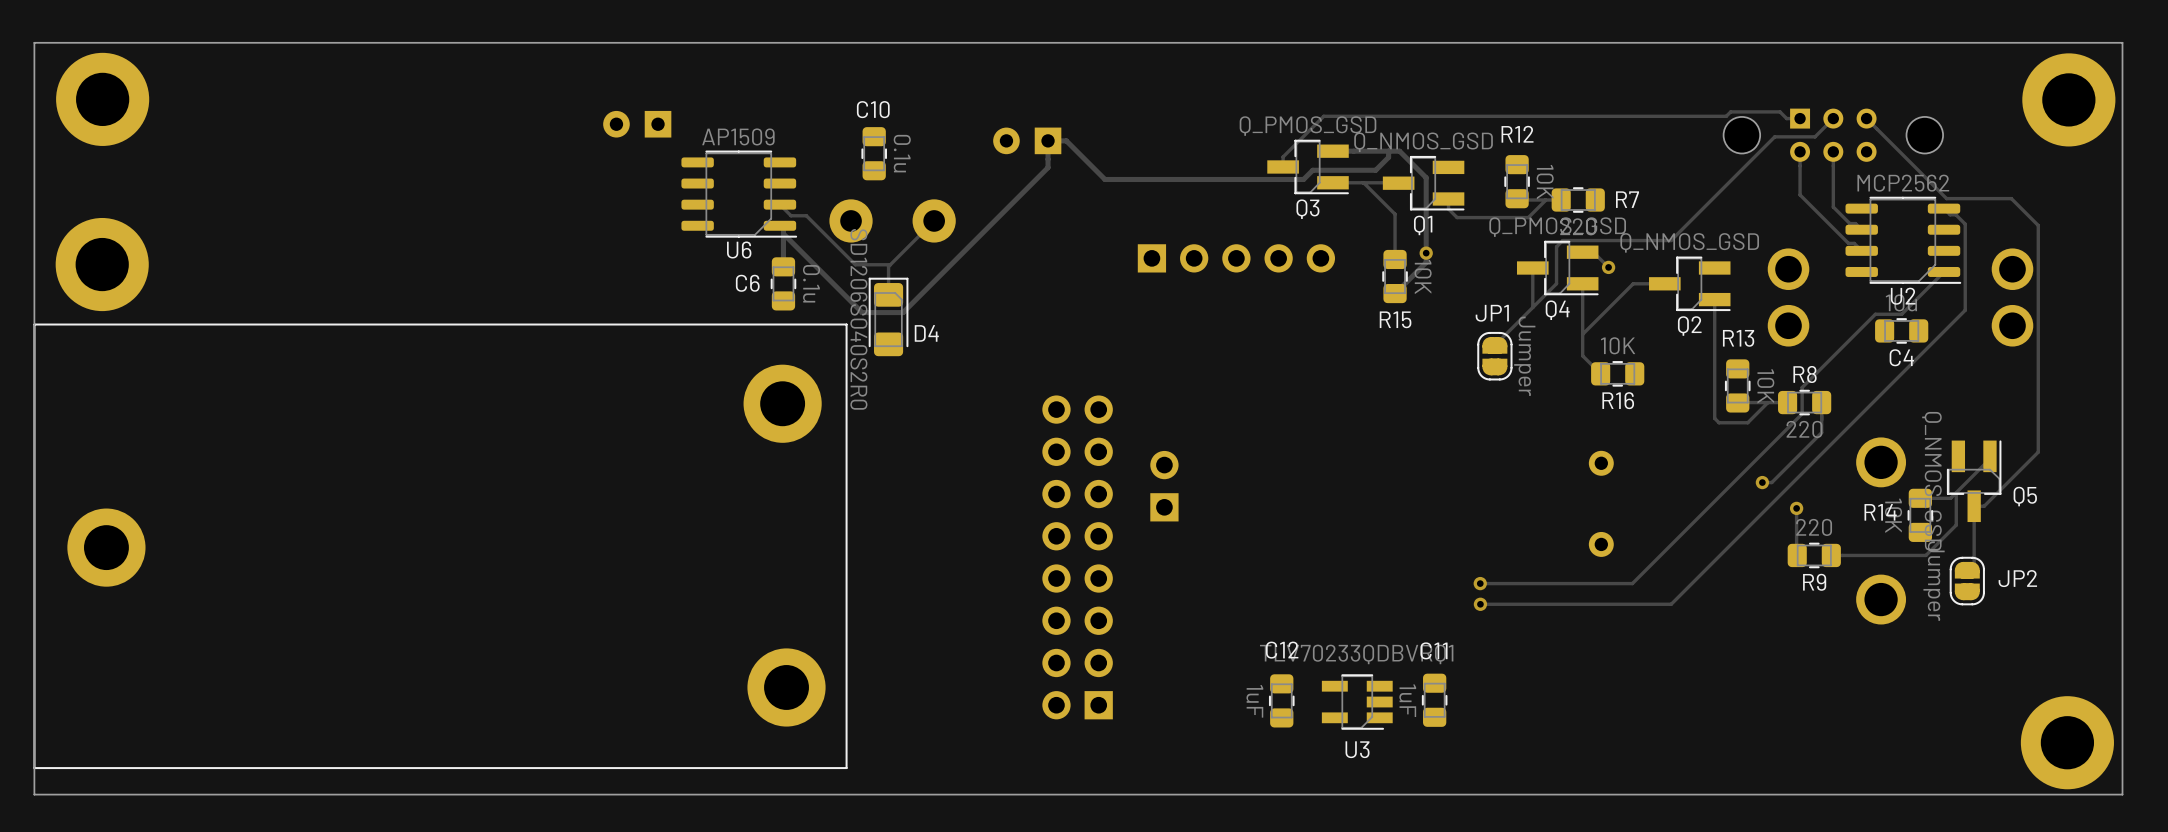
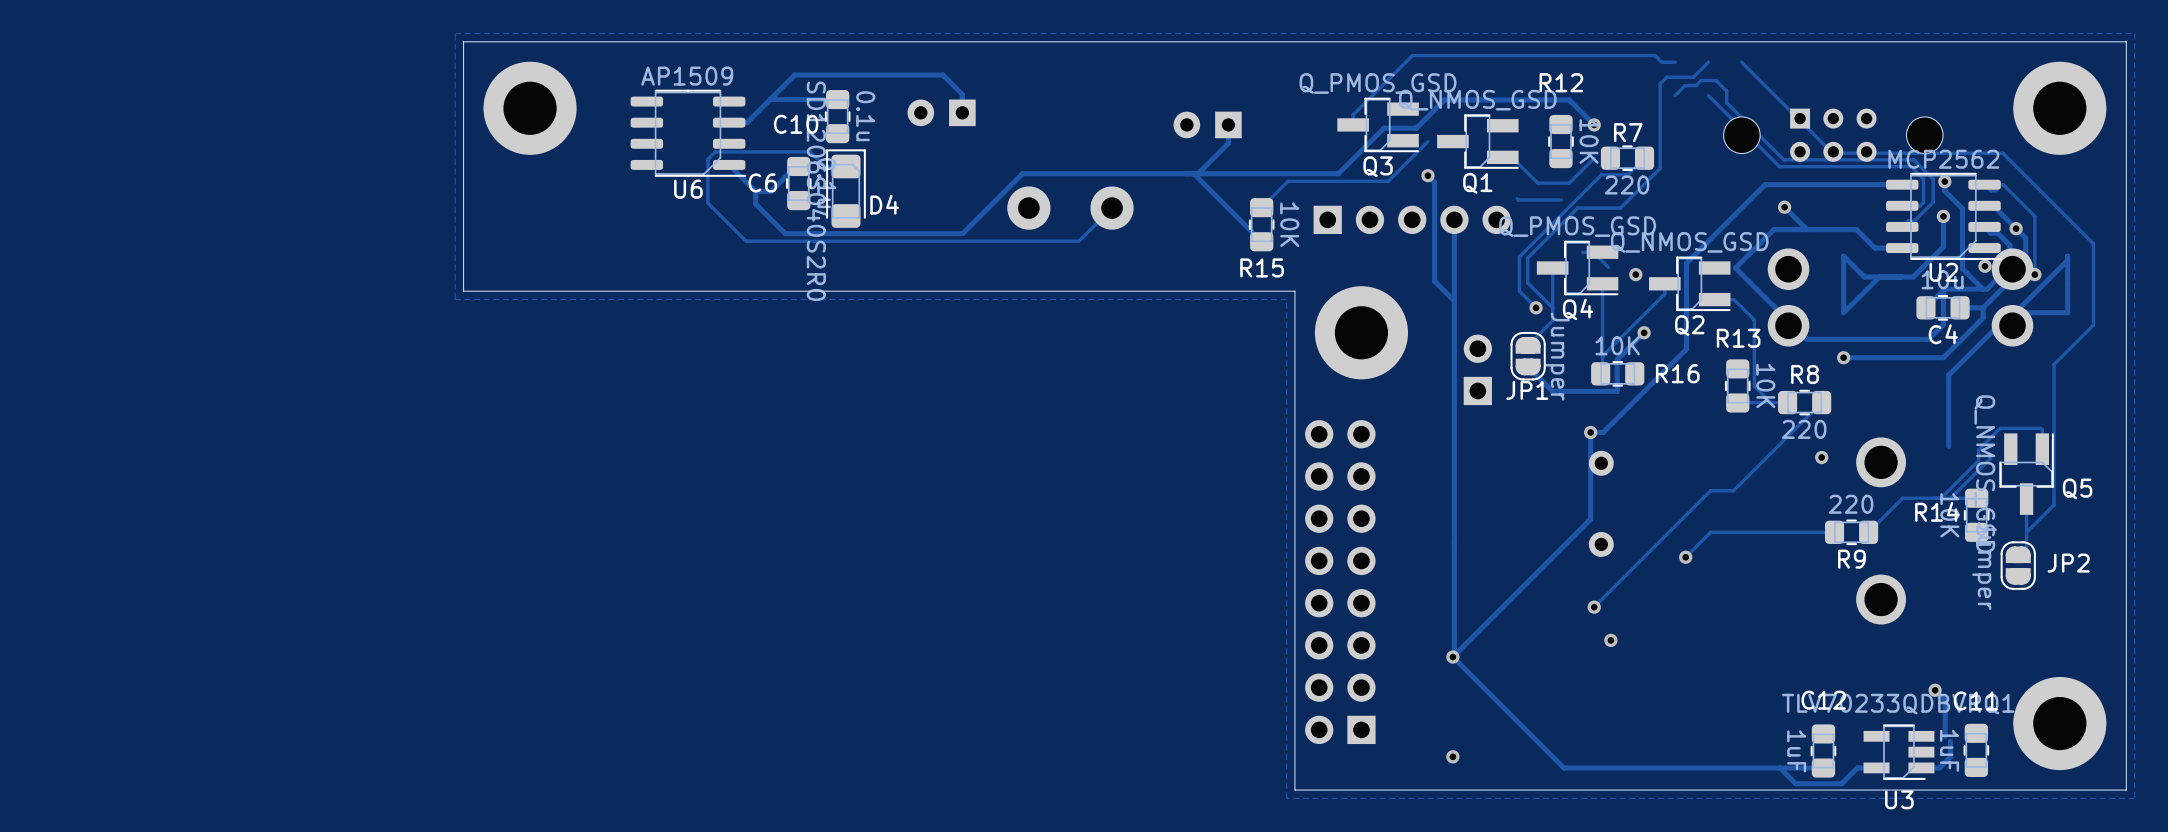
zone outline: none -> (2134, 33) (2134, 798) (1286, 798) (1286, 299) (455, 299) (455, 33) (2134, 33)
board edge: (2122, 42) (34, 42) (34, 794) (2122, 794) (2122, 42) -> (2126, 41) (2126, 790) (1294, 790) (1294, 291) (463, 291) (463, 41) (2126, 41)
track: none -> (1675, 62) (1661, 62) (1655, 55) (1412, 55) (1353, 114) (1353, 124)
track: none -> (1708, 62) (1693, 77) (1666, 77) (1660, 83) (1660, 168) (1620, 208) (1577, 208) (1527, 257) (1527, 282) (1552, 307)
track: none -> (1741, 62) (1832, 153) (2002, 153) (2093, 243) (2093, 325) (2054, 364) (2054, 504) (2026, 532)
track: none -> (1675, 95) (1685, 85) (1696, 85) (1701, 80) (1716, 80) (1726, 91) (1726, 102) (1783, 159) (1913, 159) (1933, 179) (1933, 202) (1914, 220) (1908, 220) (1902, 226)
track: none -> (1708, 95) (1779, 166) (1910, 166) (1923, 179) (1923, 202) (1920, 205) (1902, 205)
part: (102, 99) -> none
track: none -> (770, 99) (837, 99)
part position: (2068, 99) -> (2059, 108)
part: none -> (530, 108)
C10 name position: C10 (873, 109) -> C10 (796, 124)
track: none -> (962, 112) (962, 94) (942, 75) (794, 75) (747, 122) (729, 122)
track: (1800, 118) (1786, 118) (1780, 111) (1730, 111) (1726, 116) (1323, 116) (1283, 156) (1283, 166) -> none
track: (1833, 118) (1815, 136) (1774, 136) (1671, 240) (1562, 240) (1556, 246) (1556, 283) (1494, 345) -> none
track: (1866, 118) (1946, 198) (2011, 198) (2038, 225) (2038, 452) (1984, 506) (1974, 506) (1974, 563) (1967, 570) -> none
part: (637, 124) -> none
part: none -> (1207, 124)
track: none -> (1228, 124) (1228, 143) (1197, 173)
track: none -> (1594, 124) (1569, 99) (1444, 99) (1416, 128) (1383, 128) (1338, 173) (1022, 173) (962, 233) (785, 233) (755, 204) (755, 191)
via: none -> (1594, 124)
R12 name position: R12 (1517, 134) -> R12 (1561, 82)
part position: (1027, 140) -> (941, 112)
track: none -> (1427, 141) (1388, 181) (1288, 181) (1261, 207)
track: (1332, 151) (1399, 151) (1426, 177) (1426, 262) (1395, 293) -> none
track: (1388, 151) (1388, 157) (1375, 170) (1312, 170) (1303, 179) (1105, 179) (1066, 140) (1048, 140) (1048, 167) (903, 312) (862, 312) (783, 233) -> none
track: (1800, 151) (1800, 194) (1848, 243) (1854, 243) (1861, 250) -> none
track: (1833, 151) (1833, 207) (1849, 223) (1855, 223) (1861, 229) -> none
C10 position: (874, 153) -> (837, 116)
track: none -> (1502, 157) (1511, 157) (1537, 183) (1569, 183) (1594, 158)
track: none -> (1644, 158) (1627, 174) (1601, 174) (1519, 256) (1519, 291) (1536, 307)
track: none -> (729, 164) (755, 191)
track: none -> (845, 166) (824, 166) (810, 151) (715, 151) (707, 159) (707, 203) (746, 241) (1078, 241) (1112, 208)
Q3 position: (1308, 166) -> (1378, 124)
track: none -> (788, 173) (771, 191) (755, 191)
track: none -> (1193, 173) (1261, 241)
track: none -> (1427, 175) (1434, 182) (1434, 281) (1454, 301)
via: none -> (1427, 175)
R12 position: (1517, 181) -> (1560, 141)
track: none -> (1944, 181) (1944, 190) (1962, 208) (1962, 268) (1982, 289)
via: none -> (1944, 181)
track: (1332, 182) (1398, 183) -> none
track: (1363, 182) (1395, 214) (1395, 259) -> none
Q1 position: (1423, 183) -> (1477, 141)
track: none -> (1902, 184) (1764, 184) (1686, 263) (1686, 349) (1603, 432) (1590, 432) (1590, 519) (1452, 657) (1563, 768) (1823, 768)
track: none -> (1996, 190) (1990, 190) (1984, 184) (2003, 184) (2034, 216) (2034, 274)
U6 position: (739, 194) -> (688, 133)
track: (1448, 198) (1448, 209) (1457, 217) (1528, 217) (1545, 200) -> none
R7 name position: R7 (1627, 199) -> R7 (1628, 132)
R7 position: (1578, 200) -> (1627, 158)
track: (779, 204) (791, 215) (806, 215) (855, 264) (890, 264) -> none
track: none -> (1984, 205) (1993, 205) (2025, 238) (2025, 265) (1983, 307)
track: none -> (1784, 207) (1806, 229)
via: none -> (1784, 207)
track: (1944, 208) (1950, 214) (1955, 214) (1965, 224) (1965, 310) (1671, 604) (1480, 604) -> none
track: none -> (1943, 216) (1943, 246) (1913, 276) (1864, 276) (1843, 256) (1843, 312) (1879, 276)
via: none -> (1943, 216)
track: none -> (1454, 219) (1454, 655)
part position: (892, 220) -> (1070, 208)
track: (934, 220) (888, 266) (888, 294) -> none
track: (779, 225) (783, 229) (783, 266) -> none
track: none -> (1984, 226) (1990, 233) (1997, 233) (2009, 245) (2009, 266) (1987, 289) (1944, 289) (1925, 307)
via: none -> (2016, 228)
U2 position: (1903, 240) -> (1943, 216)
track: none -> (1902, 248) (1874, 248) (1856, 229) (1774, 229) (1735, 268) (1806, 339) (1928, 339) (1943, 324) (1943, 290)
via: (1426, 253) -> none
track: none -> (2067, 256) (2067, 312) (2011, 312) (1948, 375) (1948, 446)
part position: (1236, 258) -> (1412, 219)
track: none -> (2067, 260) (2015, 312)
part: (102, 264) -> none
via: none -> (1985, 266)
via position: (1608, 267) -> (1635, 274)
track: (1532, 268) (1532, 307) -> none
track: none -> (1552, 268) (1552, 320) (1528, 345)
Q4 position: (1557, 268) -> (1577, 268)
track: (1944, 271) (1901, 314) (1875, 314) (1802, 387) (1802, 413) (1632, 583) (1480, 583) -> none
via: none -> (2034, 274)
R15 position: (1395, 276) -> (1261, 224)
C6 position: (783, 283) -> (798, 183)
track: (1582, 283) (1582, 355) (1600, 373) -> (1602, 283) (1602, 371) (1600, 373)
track: (1664, 283) (1633, 283) (1582, 334) -> (1664, 283) (1664, 293) (1602, 356)
track: (1714, 299) (1714, 418) (1719, 422) (1747, 422) (1767, 402) -> (1714, 299) (1733, 299) (1754, 320) (1754, 386) (1770, 402)
via: none -> (1536, 307)
track: none -> (1983, 307) (1960, 307)
track: none -> (1983, 307) (1983, 318) (1943, 357) (1843, 357)
JP1 name position: JP1 (1492, 313) -> JP1 (1527, 390)
D4 position: (888, 316) -> (845, 188)
line: (846, 324) (846, 768) (34, 768) (34, 324) (846, 324) -> none
C4 position: (1901, 330) -> (1943, 307)
part: none -> (1361, 332)
track: none -> (1644, 332) (1617, 359) (1617, 391) (1552, 391) (1528, 367)
via: none -> (1644, 332)
JP1 position: (1494, 356) -> (1528, 356)
via: none -> (1843, 357)
R16 name position: R16 (1618, 400) -> R16 (1677, 373)
track: (1821, 402) (1821, 432) (1771, 482) (1762, 482) -> (1821, 402) (1733, 490) (1710, 490) (1594, 607)
part: (782, 403) -> none
via: none -> (1590, 432)
track: none -> (2042, 449) (2042, 430) (2040, 428) (2000, 428) (1978, 449) (1978, 460) (1941, 498)
via: none -> (1821, 457)
Q5 position: (1974, 481) -> (2026, 474)
via: (1762, 482) -> none
part position: (1164, 486) -> (1477, 369)
track: (1956, 492) (1956, 525) (1925, 555) (1831, 555) -> none
track: none -> (1920, 498) (1902, 498) (1868, 532)
track: none -> (2026, 499) (2026, 546) (2018, 554)
track: (1796, 508) (1797, 555) -> none
via: (1796, 508) -> none
R14 position: (1920, 515) -> (1976, 515)
track: none -> (1834, 532) (1710, 532) (1685, 557)
part: (106, 547) -> none
R9 position: (1814, 555) -> (1851, 532)
part position: (1077, 557) -> (1340, 582)
via: none -> (1685, 557)
JP2 position: (1967, 581) -> (2018, 565)
via: (1480, 583) -> none
via: (1480, 604) -> none
via: none -> (1594, 607)
via: none -> (1610, 640)
via: none -> (1452, 657)
part: (786, 687) -> none
track: none -> (1935, 690) (1945, 700) (1945, 736)
via: none -> (1935, 690)
C12 position: (1281, 700) -> (1823, 751)
C11 position: (1434, 700) -> (1976, 750)
U3 position: (1357, 702) -> (1898, 752)
track: none -> (1950, 741) (1950, 756) (1939, 767) (1921, 767)
part position: (2067, 742) -> (2059, 723)
via: none -> (1452, 756)
track: none -> (1876, 767) (1857, 767) (1841, 783) (1795, 783) (1780, 768)

